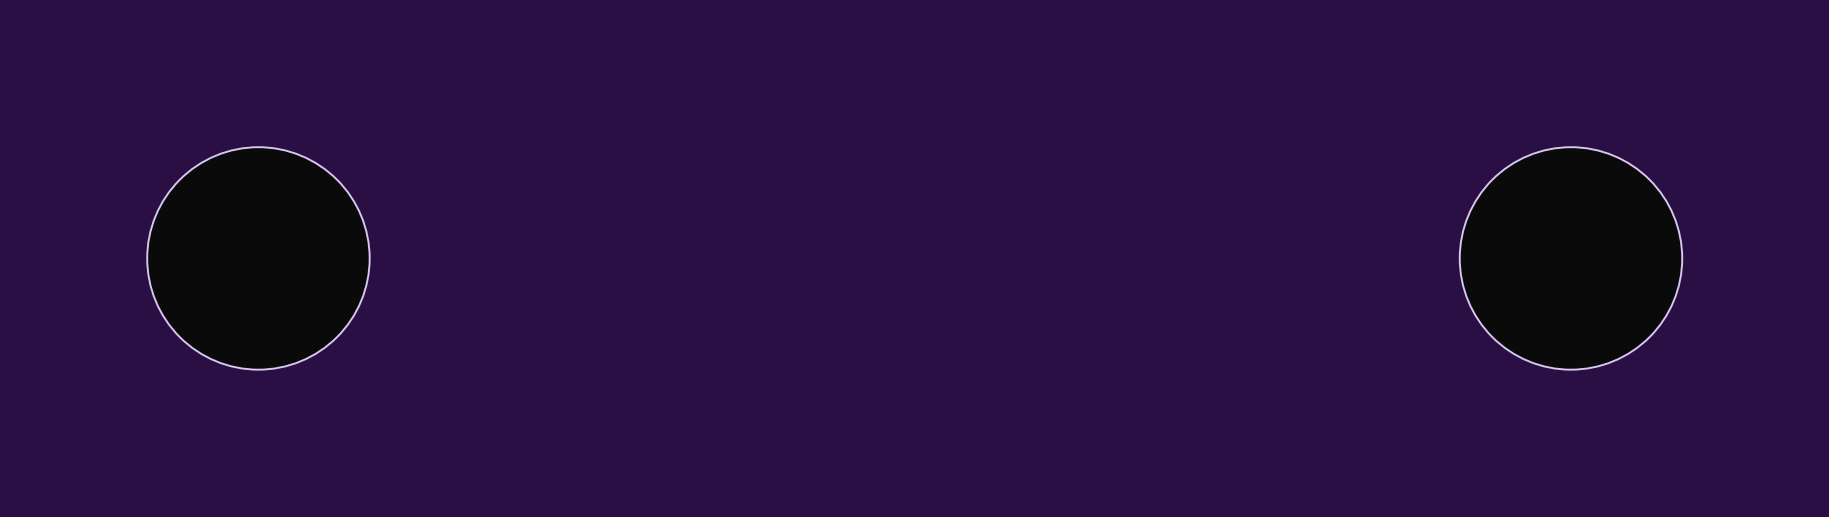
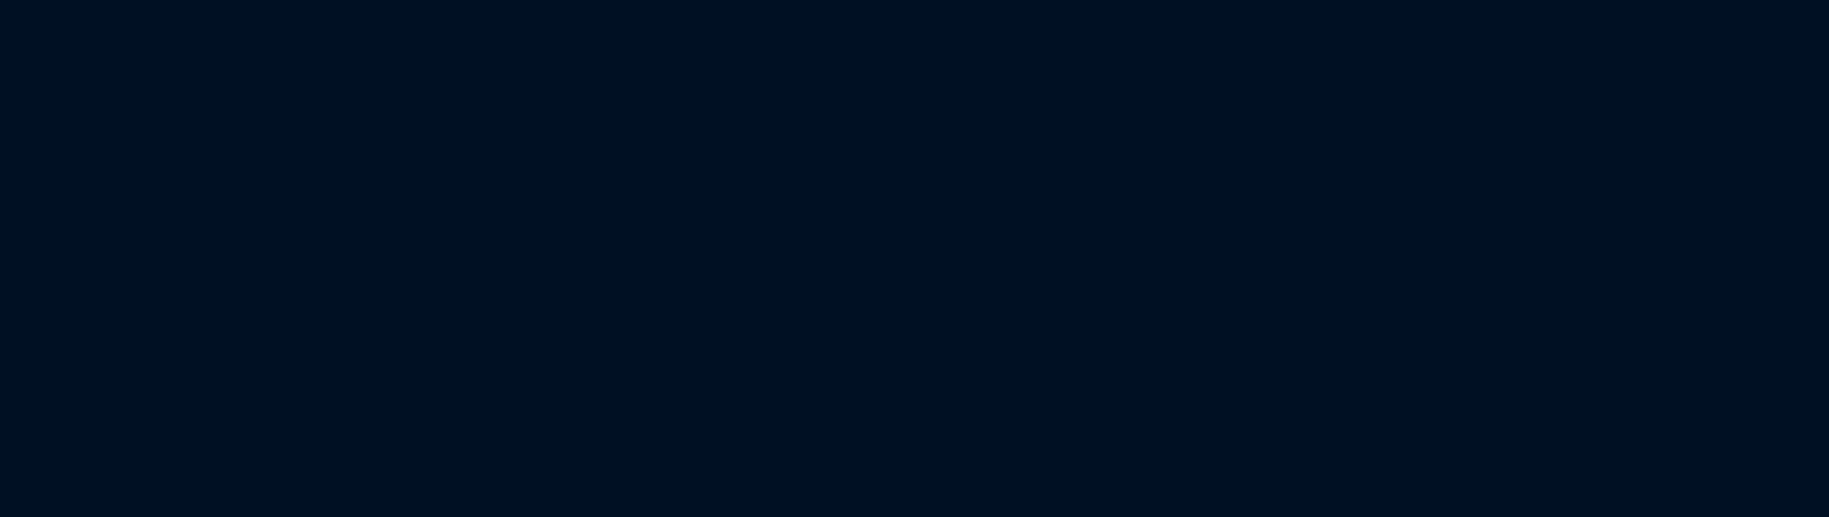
part: (258, 258) -> none
part: (1570, 258) -> none

